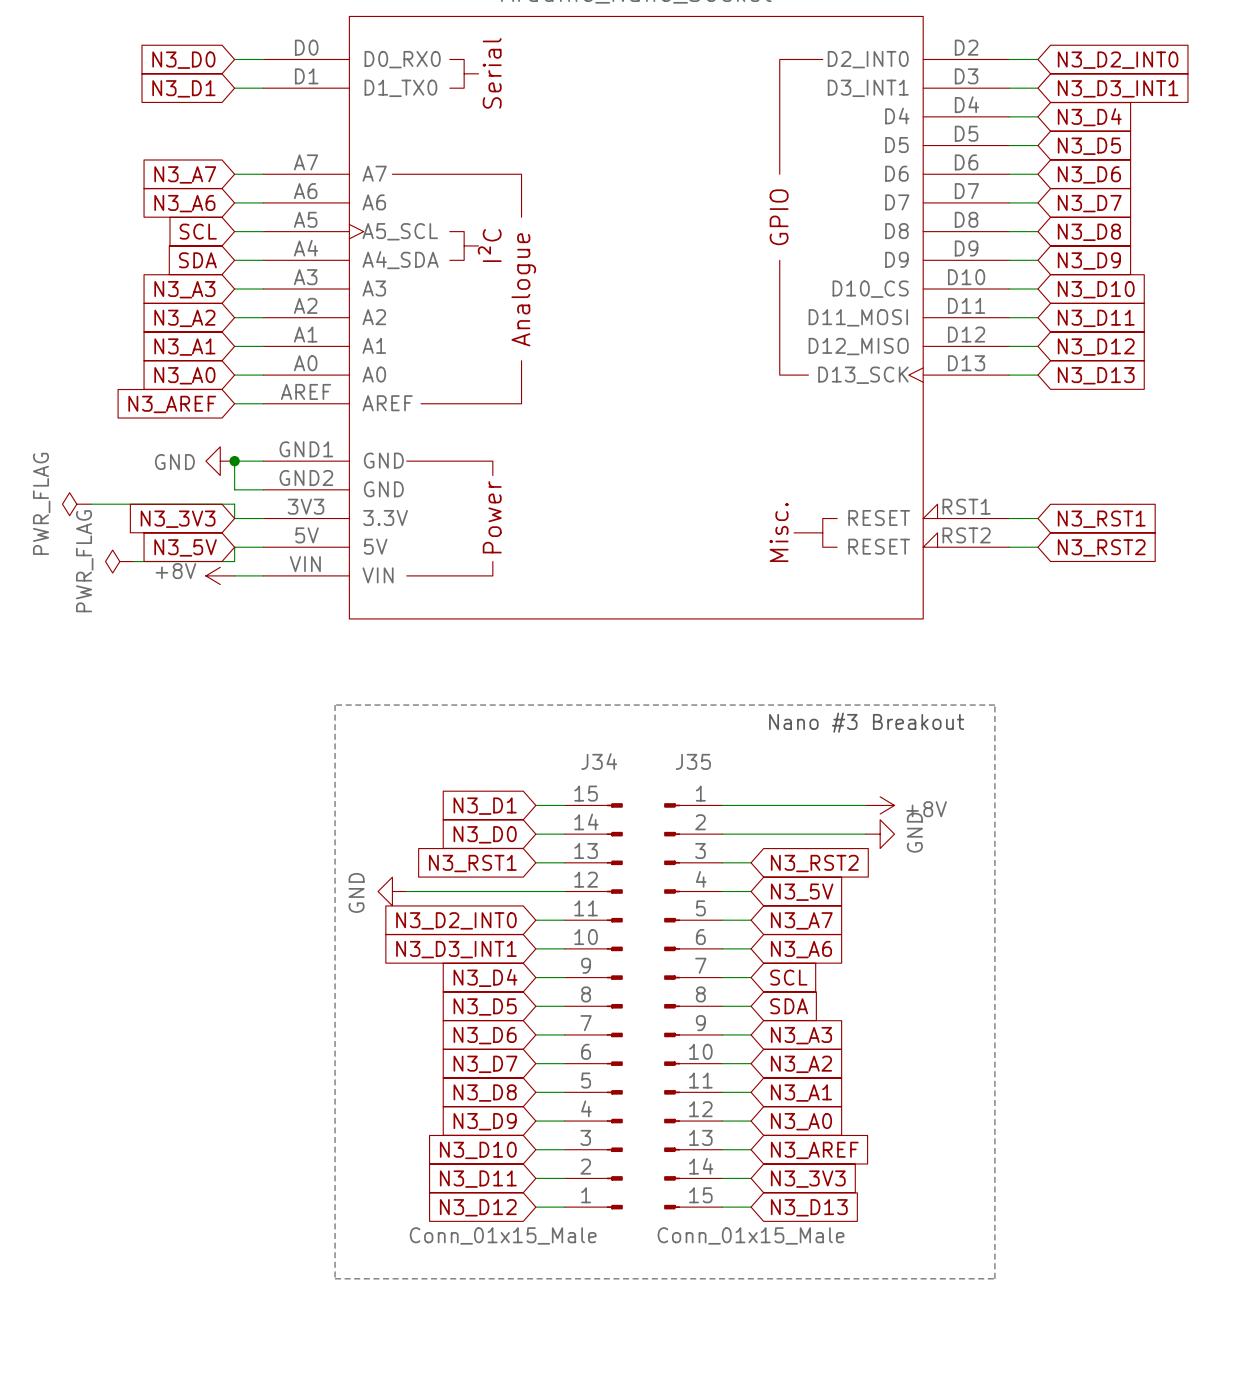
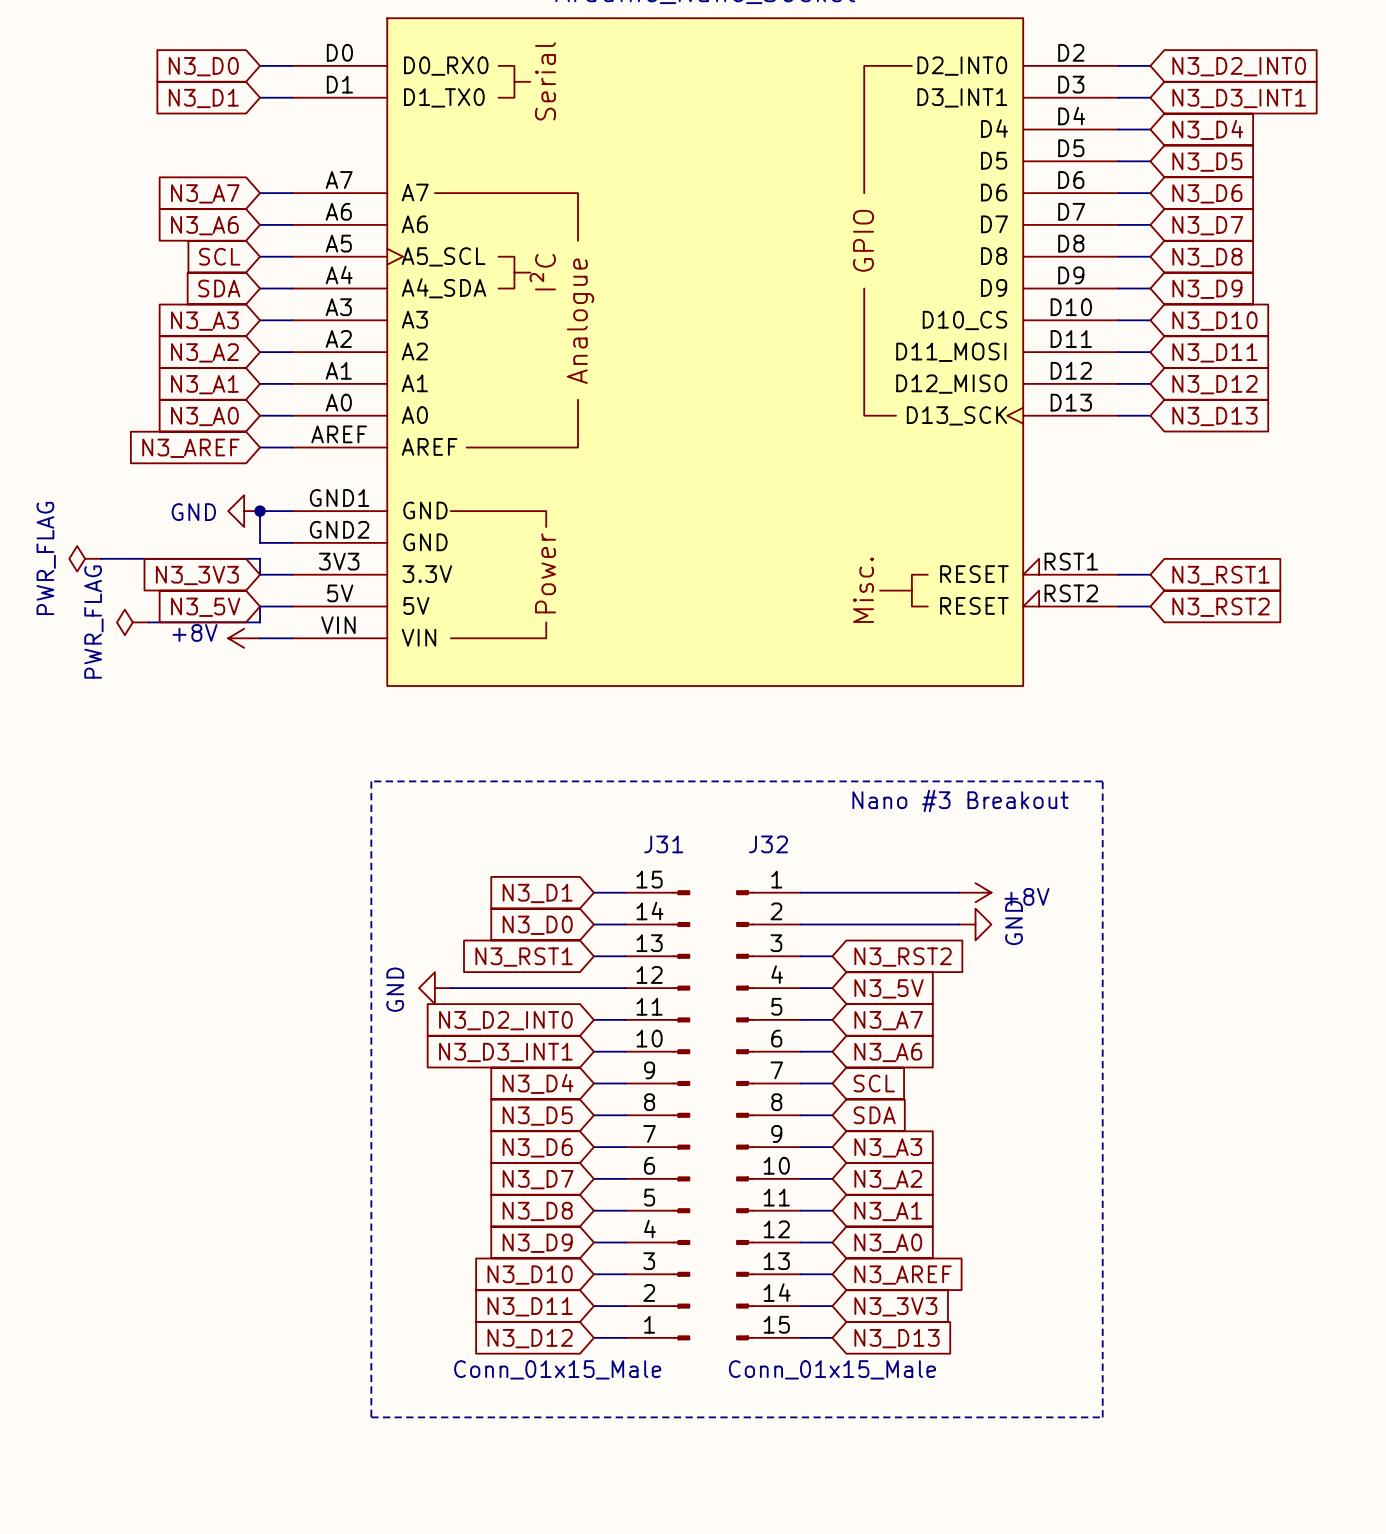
J34 name: J34 (599, 761) -> J31 (663, 844)
J35 name: J35 (693, 761) -> J32 (768, 844)

